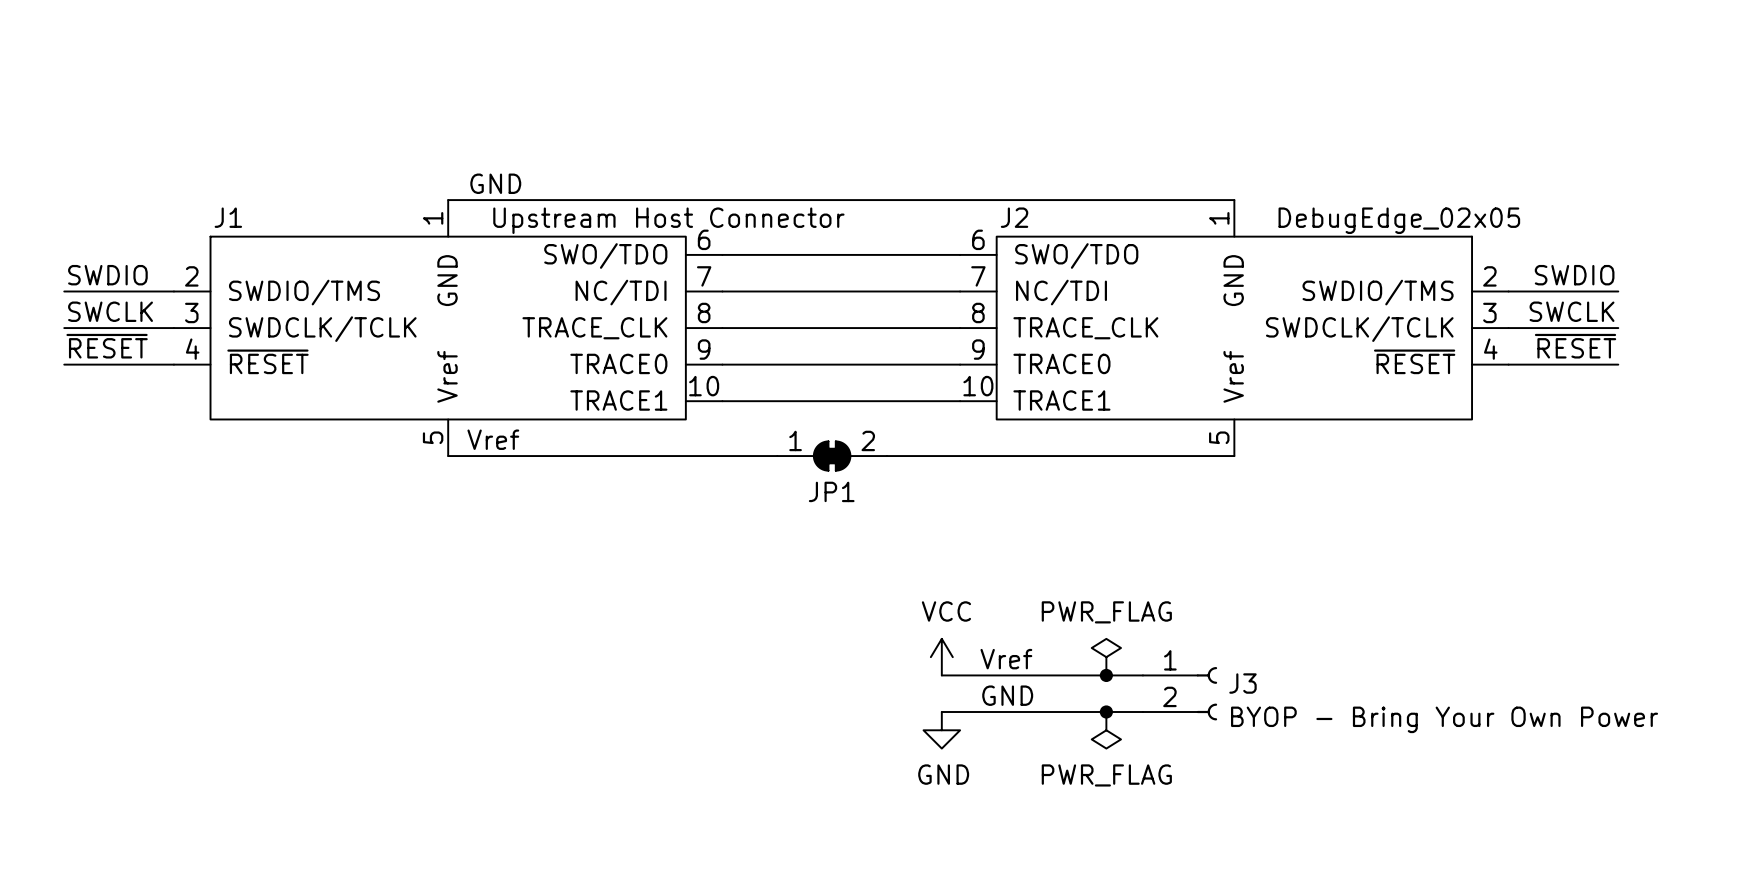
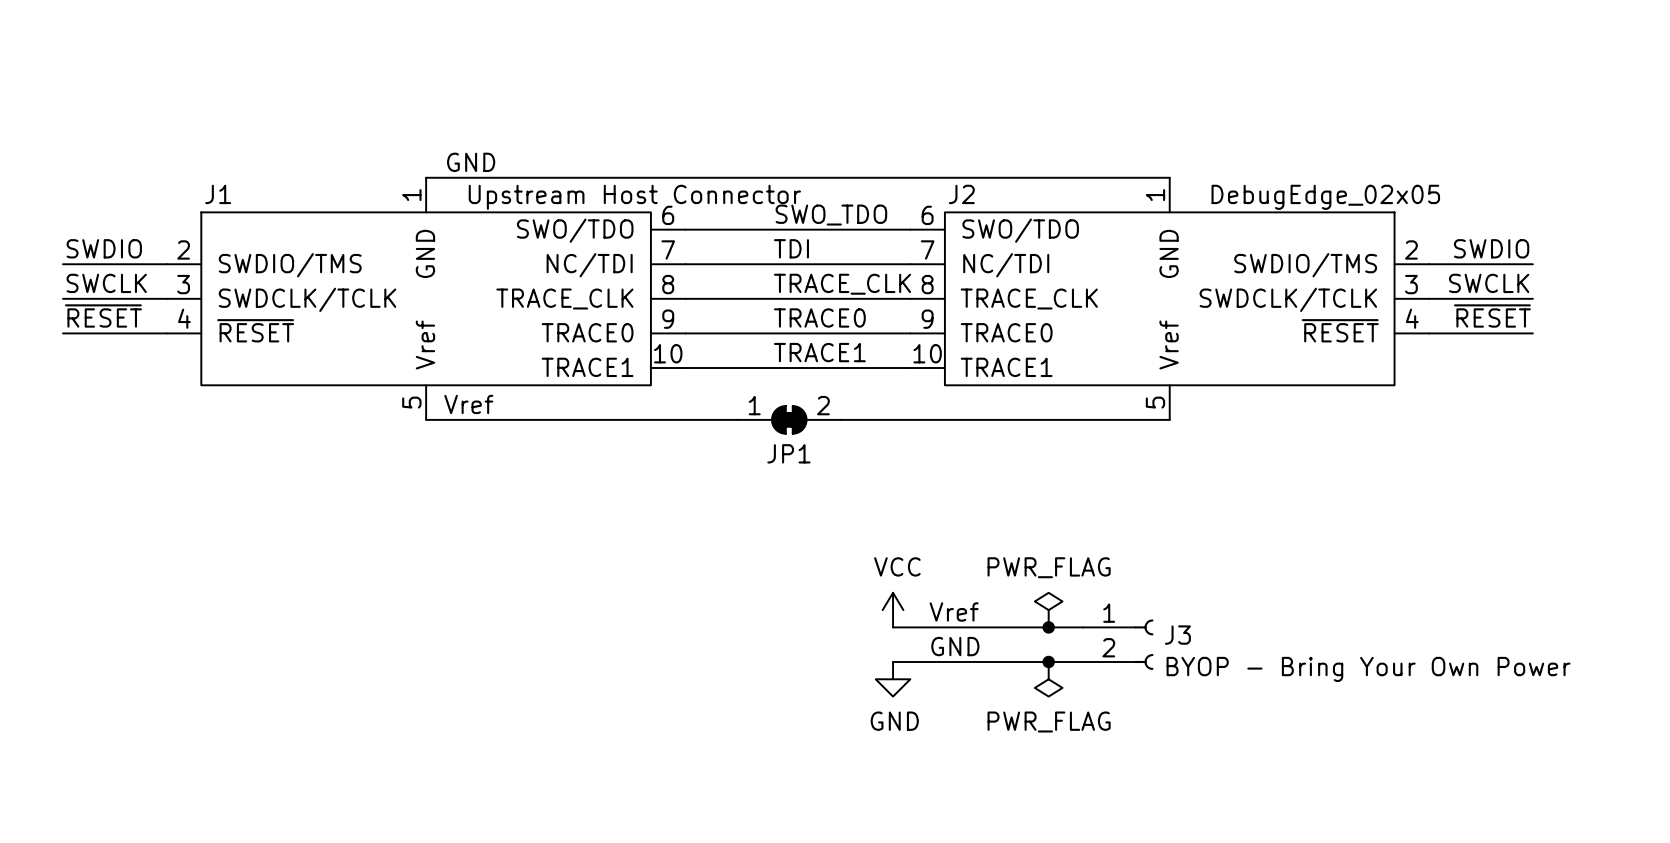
label: none -> SWO_TDO (831, 215)
label: none -> TDI (791, 248)
label: none -> TRACE_CLK (842, 284)
label: none -> TRACE0 (819, 317)
label: none -> TRACE1 (819, 352)

